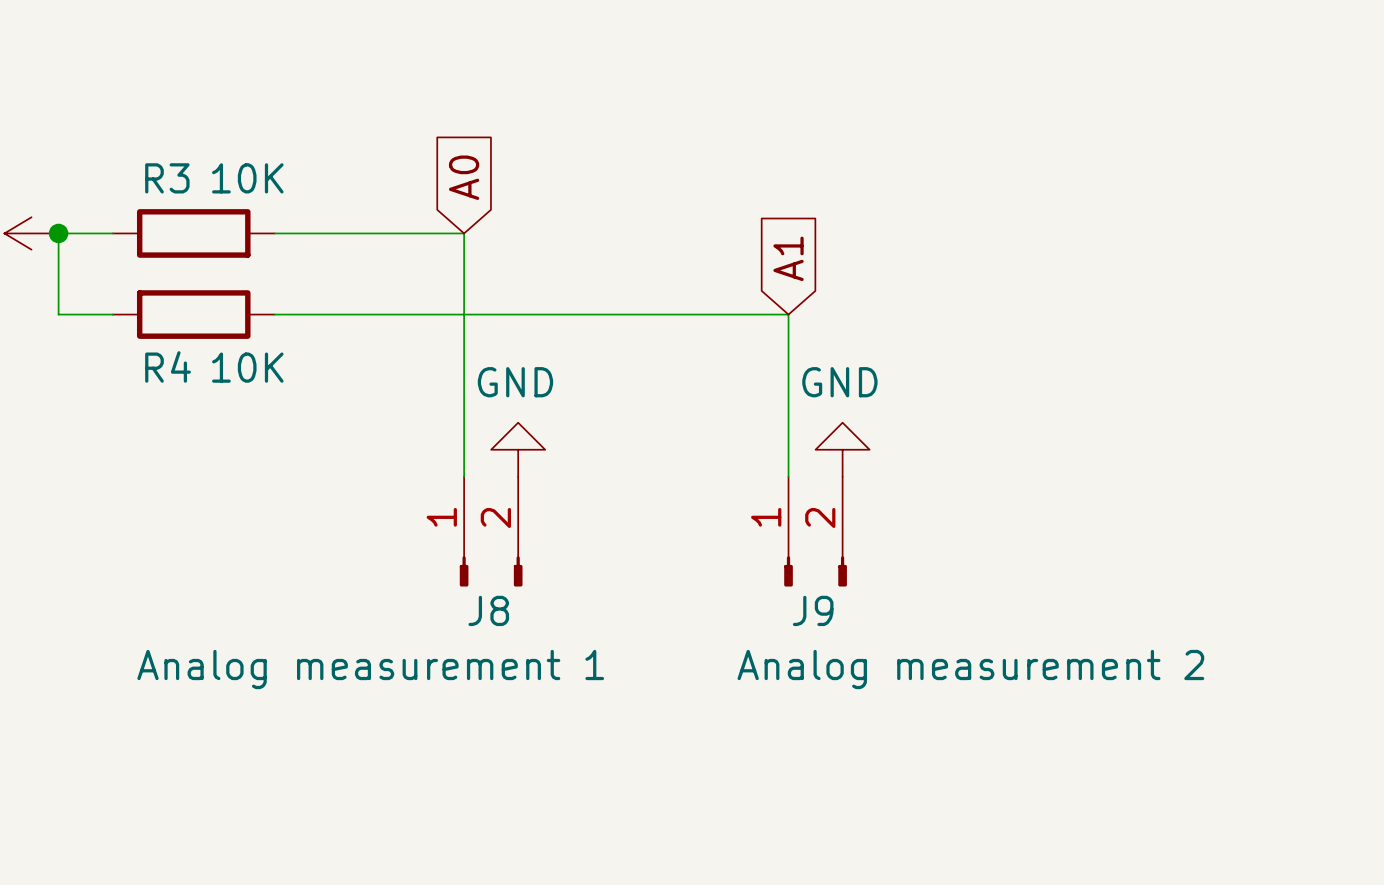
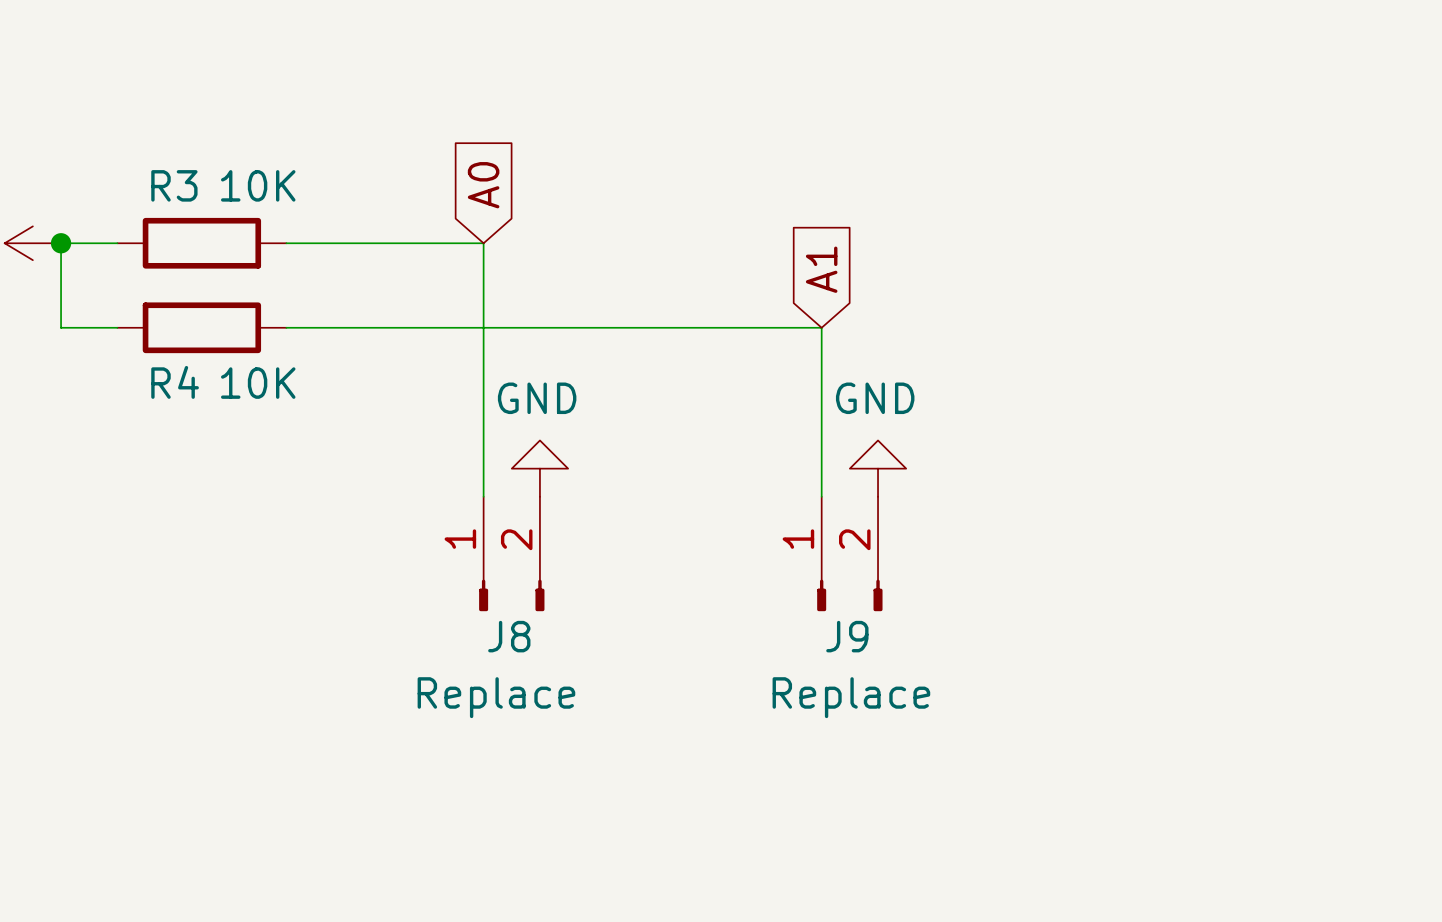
J8 value: Analog measurement 1 (370, 669) -> Replace (496, 697)
J9 value: Analog measurement 2 (970, 669) -> Replace (851, 697)

